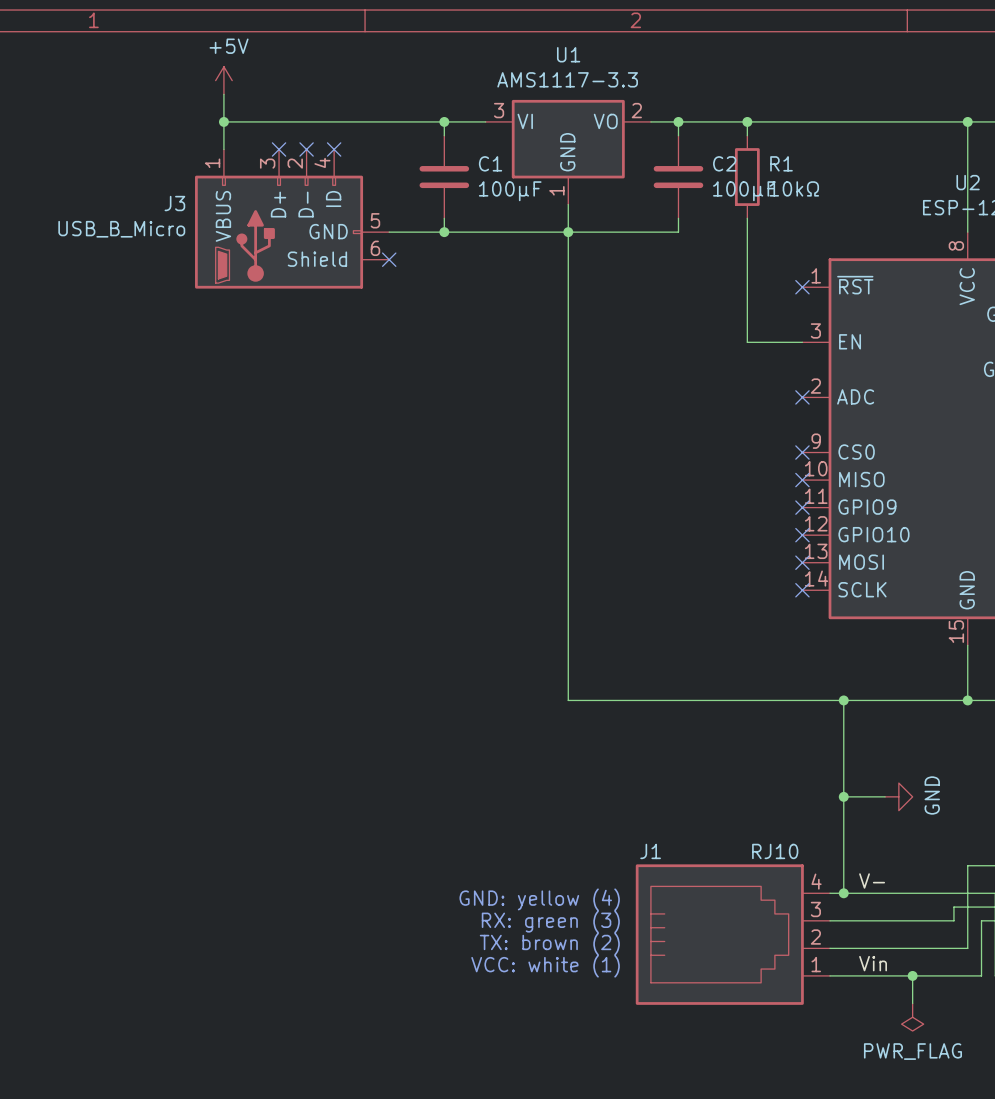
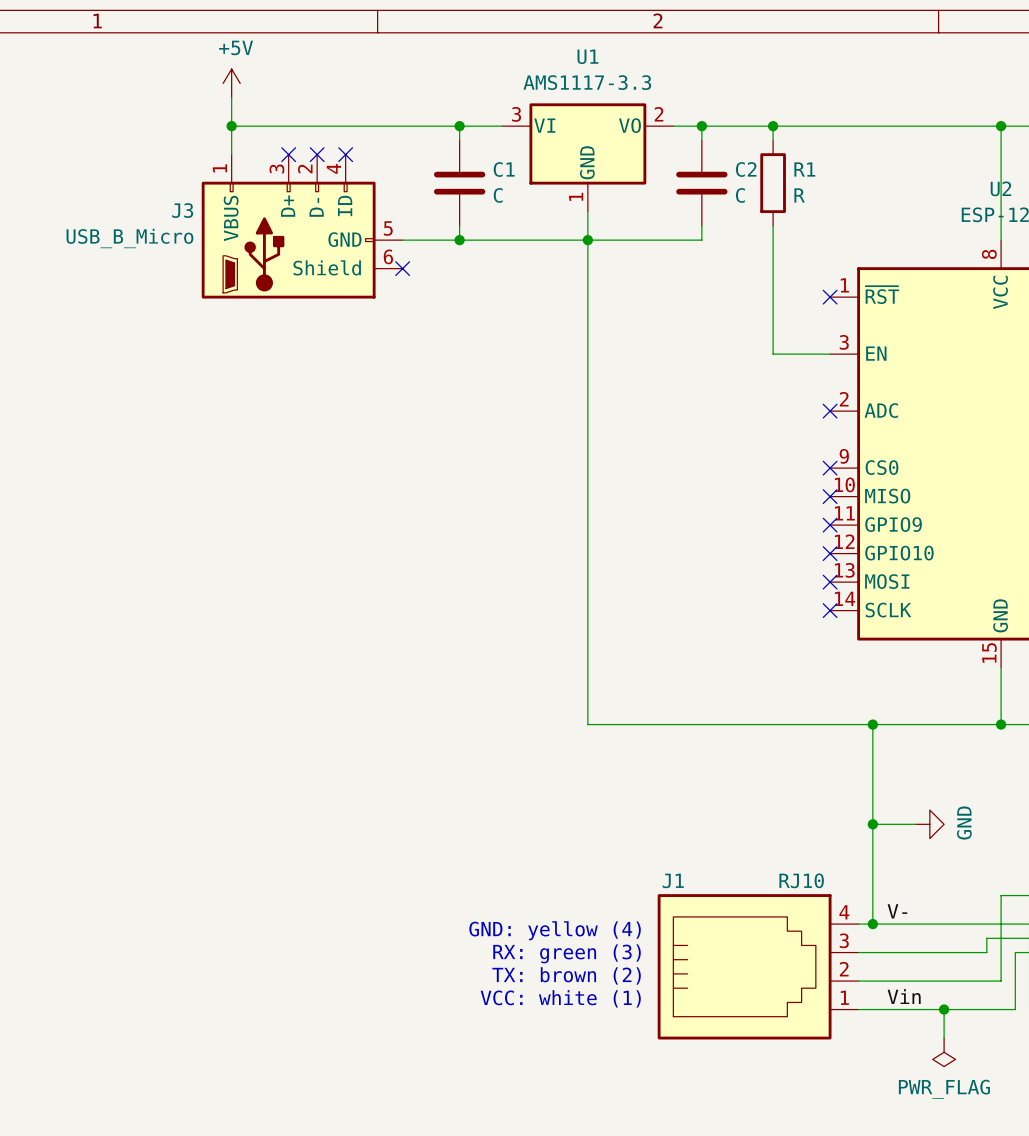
R1 value: 10kΩ (794, 188) -> R (799, 195)
C1 value: 100µF (510, 191) -> C (498, 195)
C2 value: 100µF (744, 191) -> C (740, 195)

